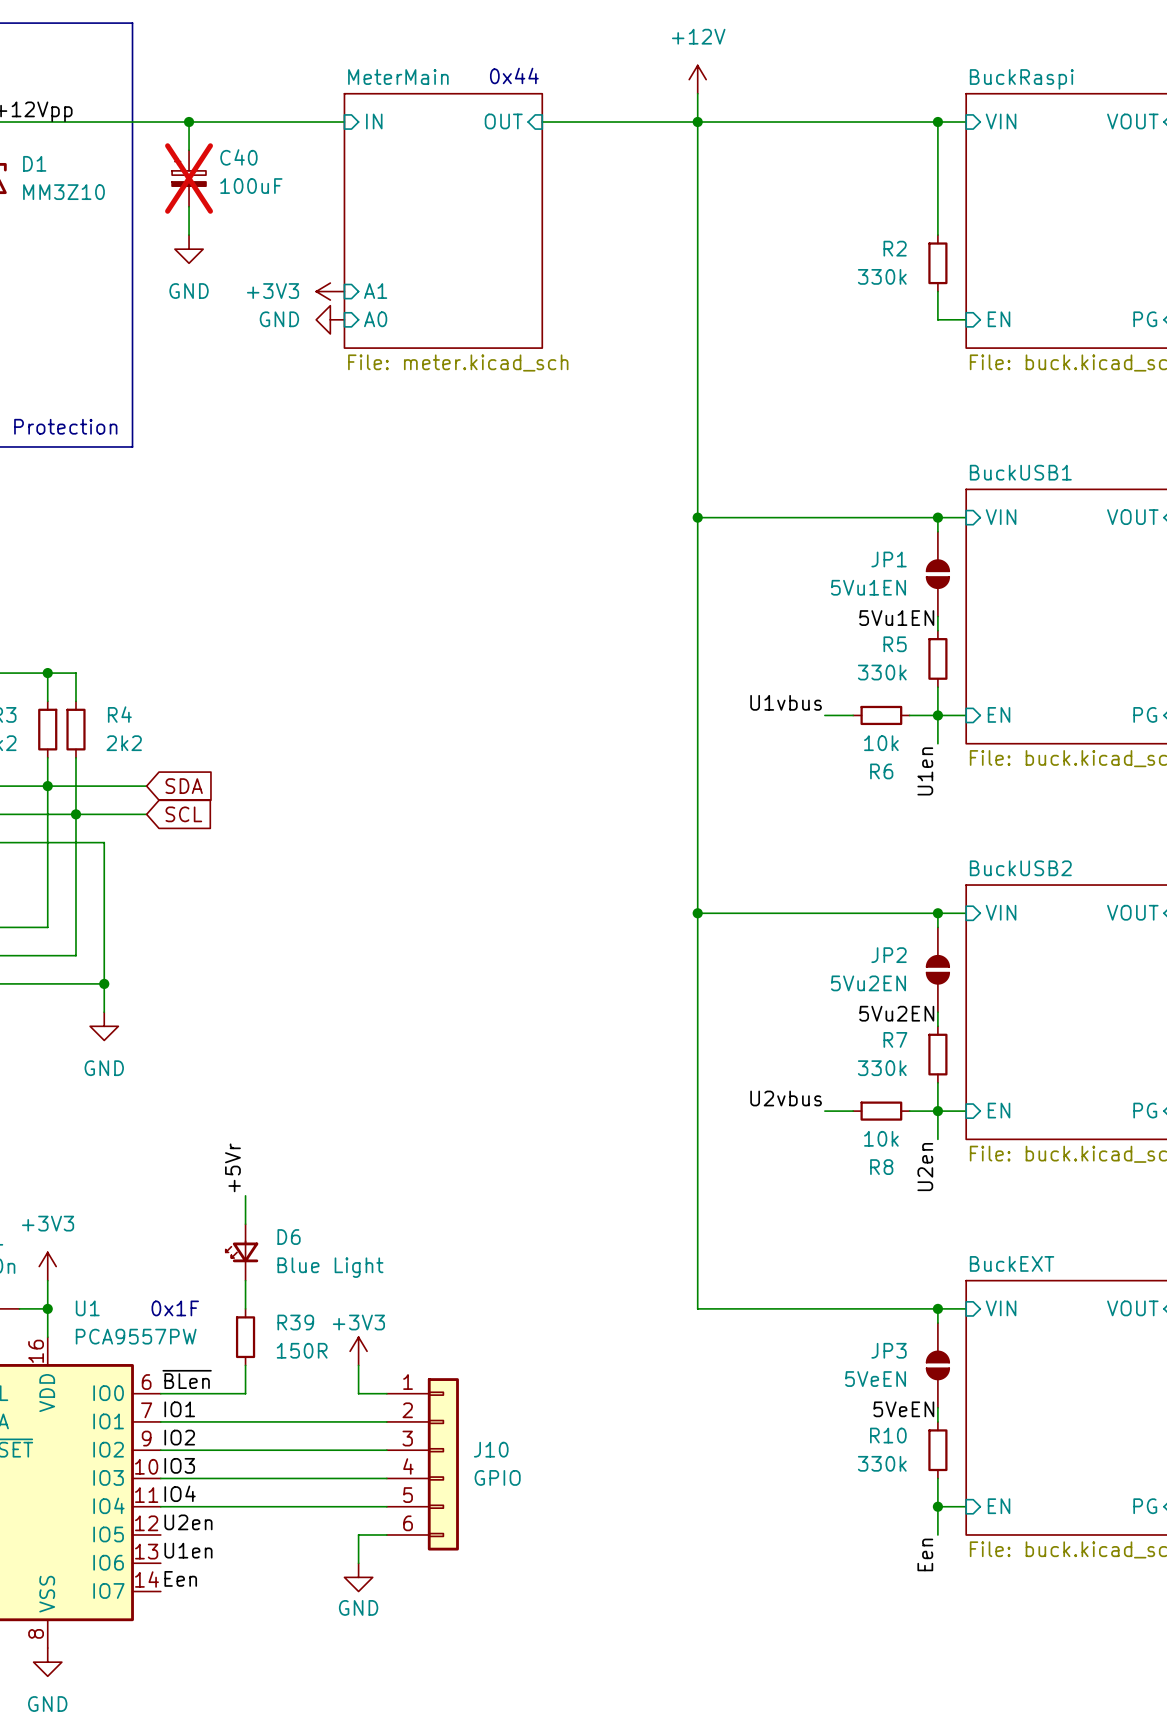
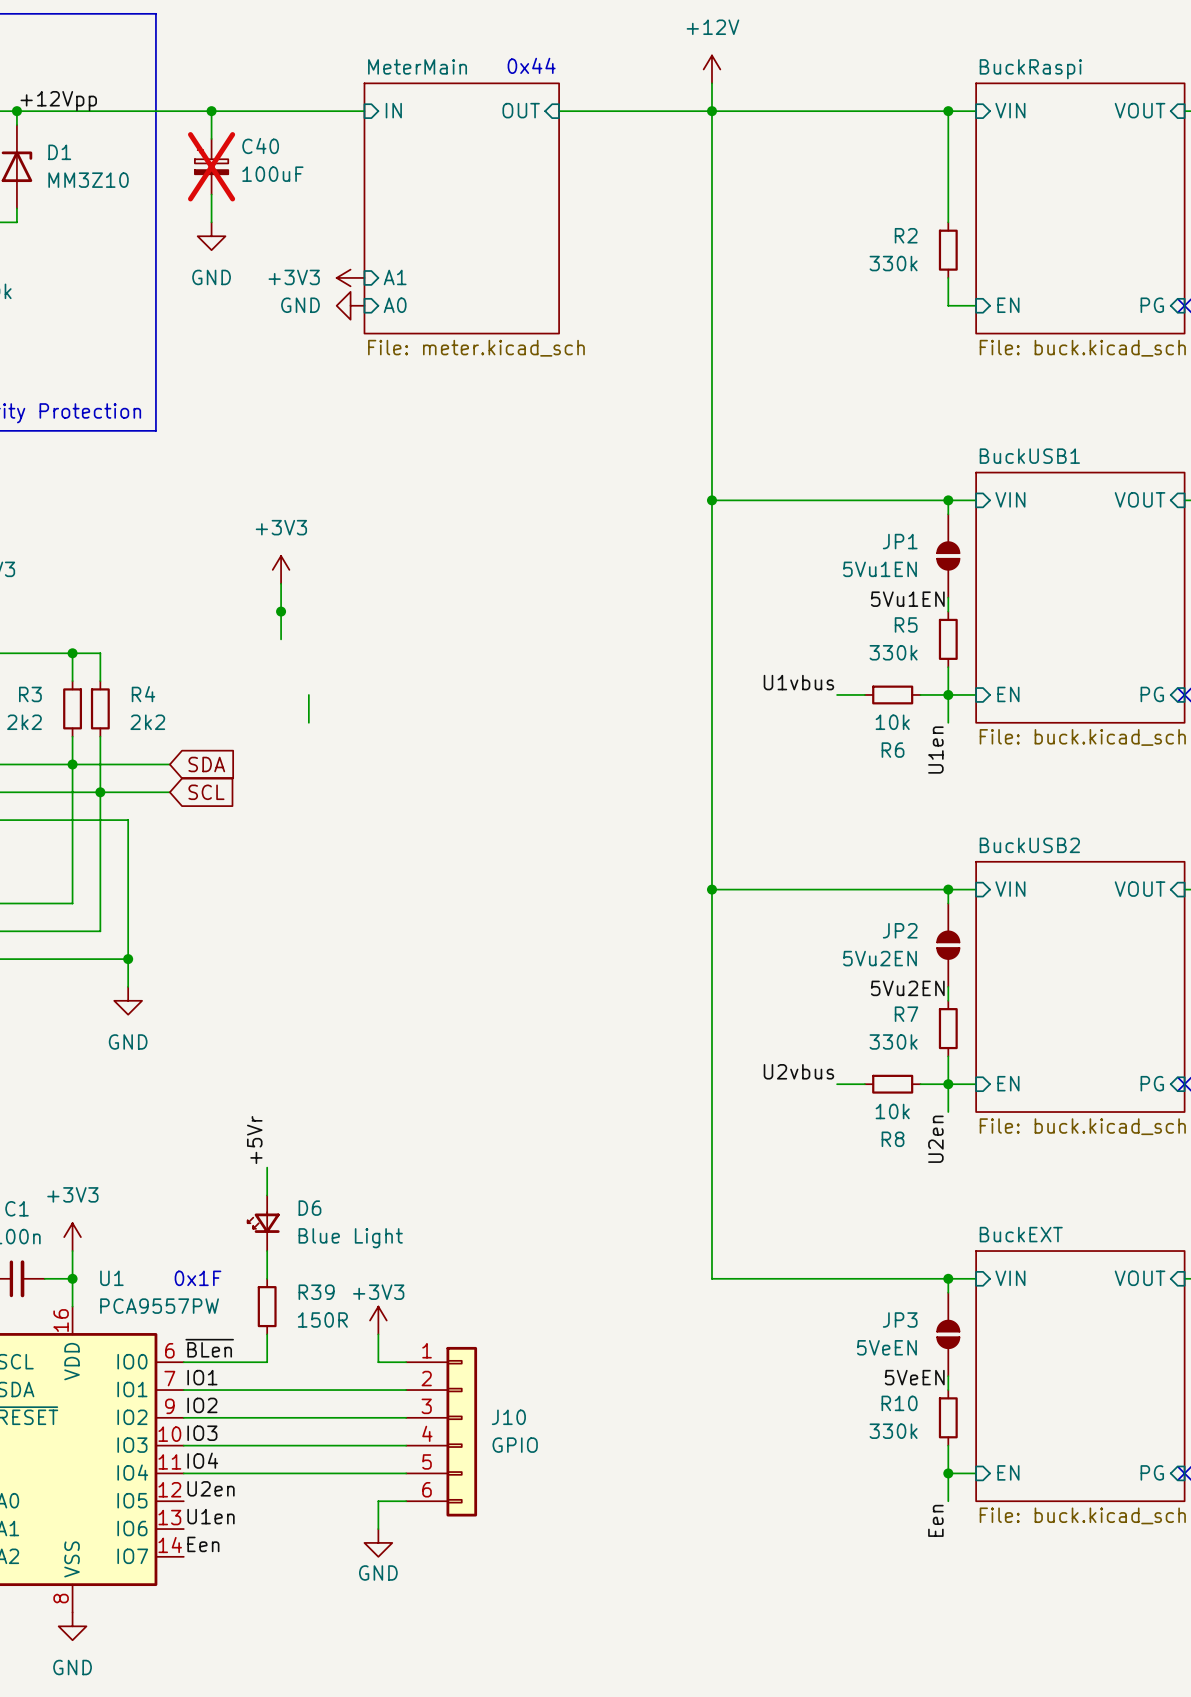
power symbol: none -> +3V3 (281, 569)
wire: none -> (281, 583) (281, 639)
junction: none -> (281, 611)
wire: none -> (308, 694) (308, 722)

